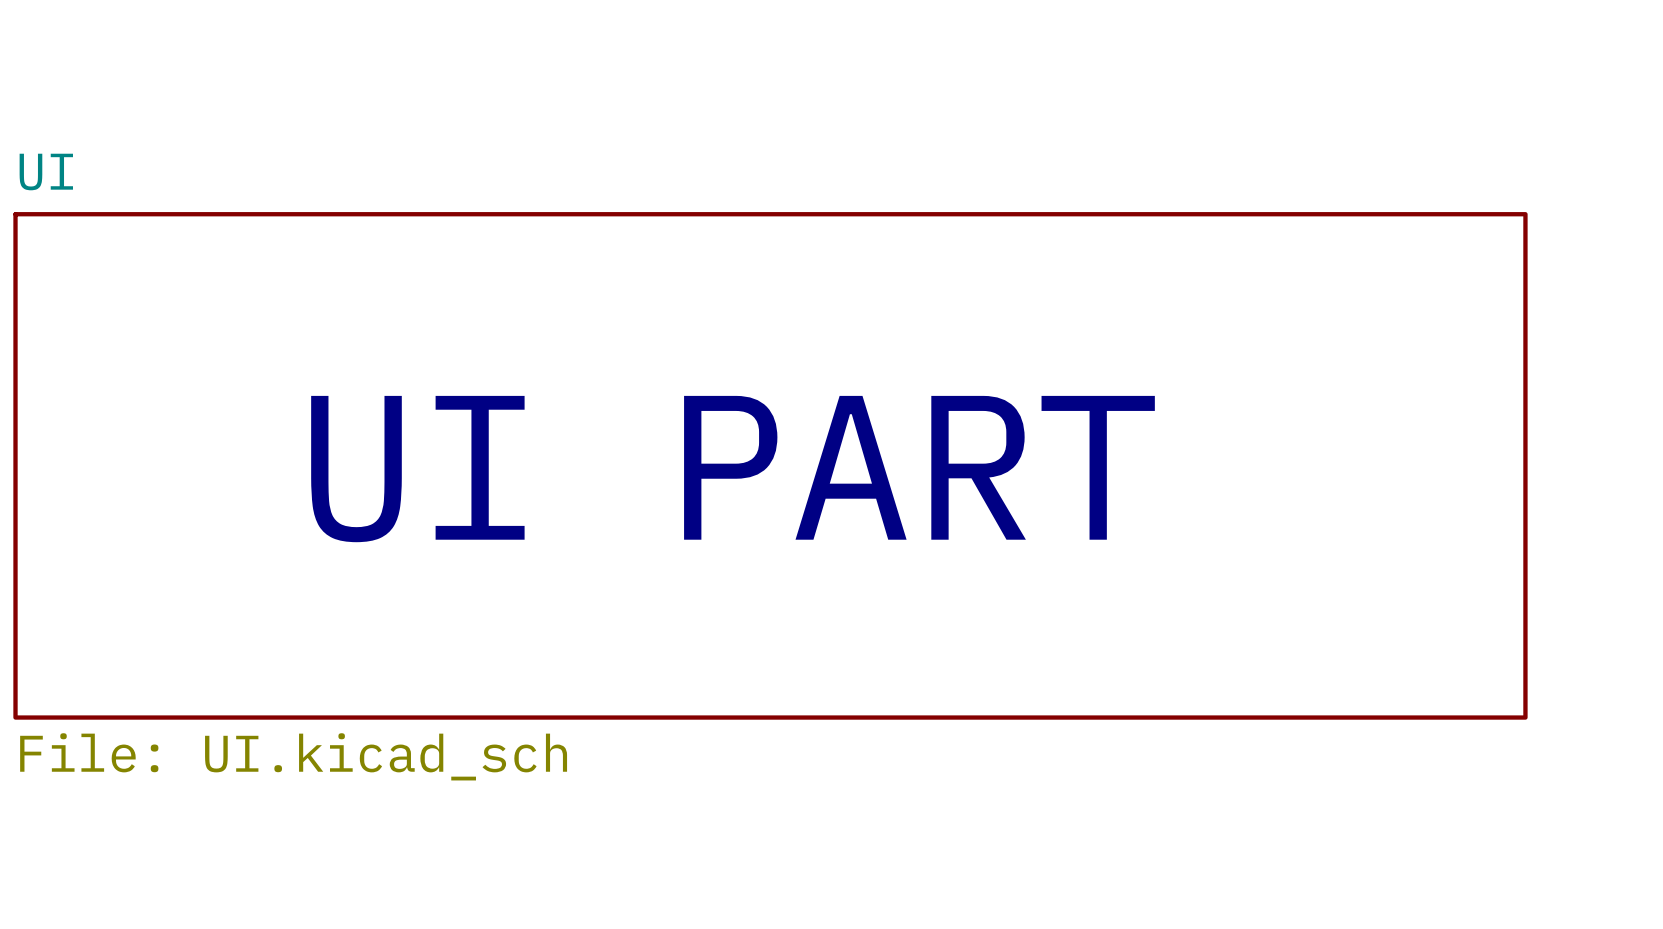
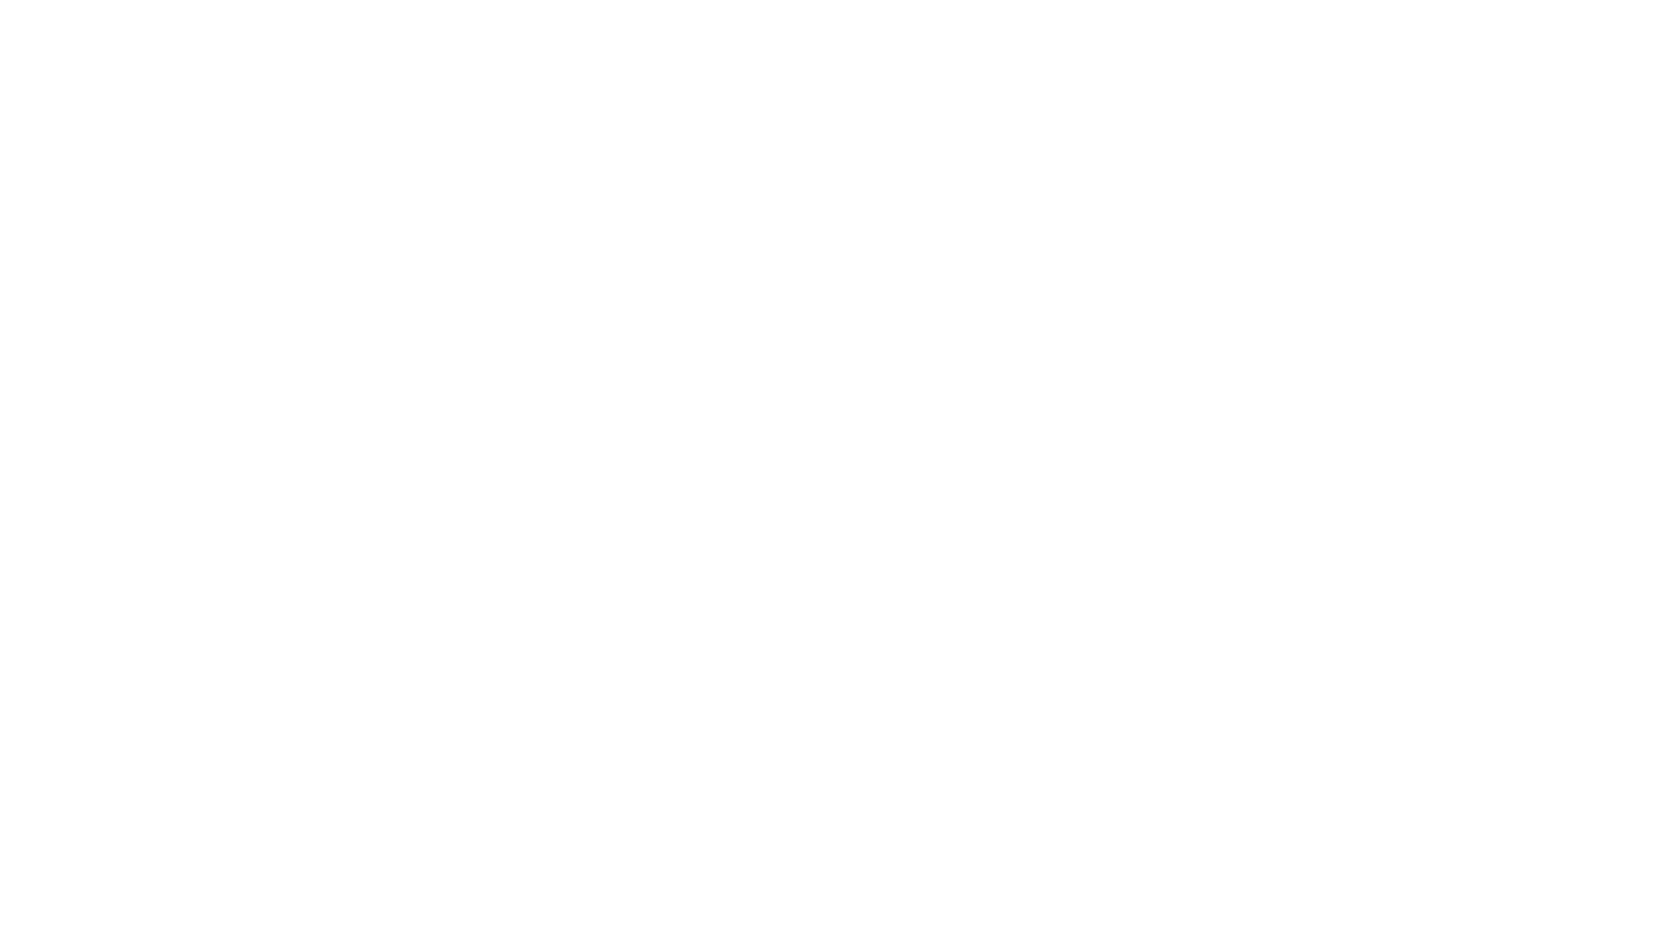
sheet UI: File: UI.kicad_sch (770, 465) -> none
text: UI PART (733, 469) -> none

